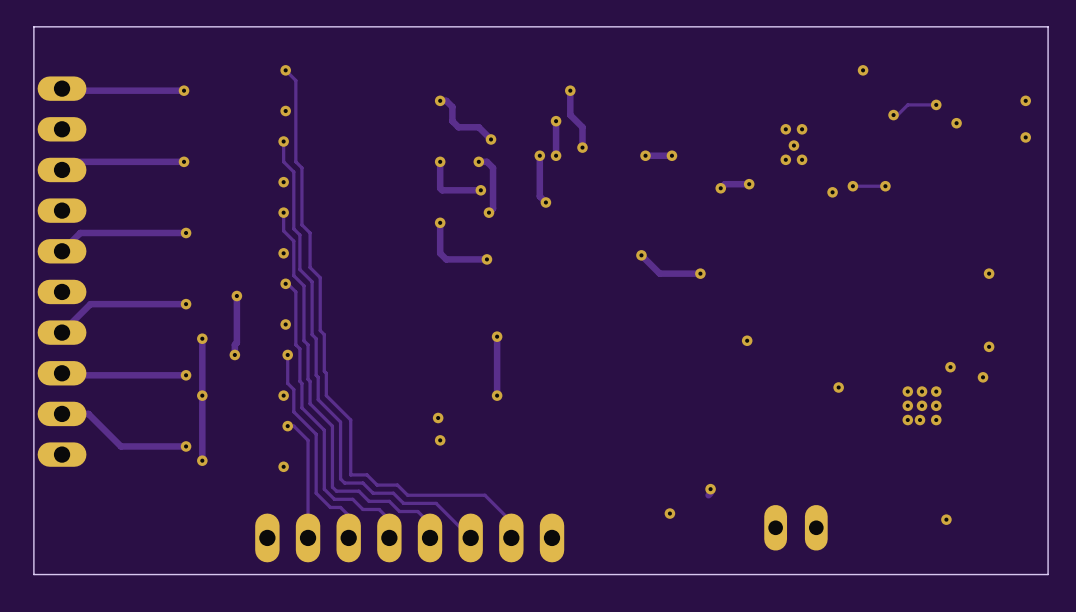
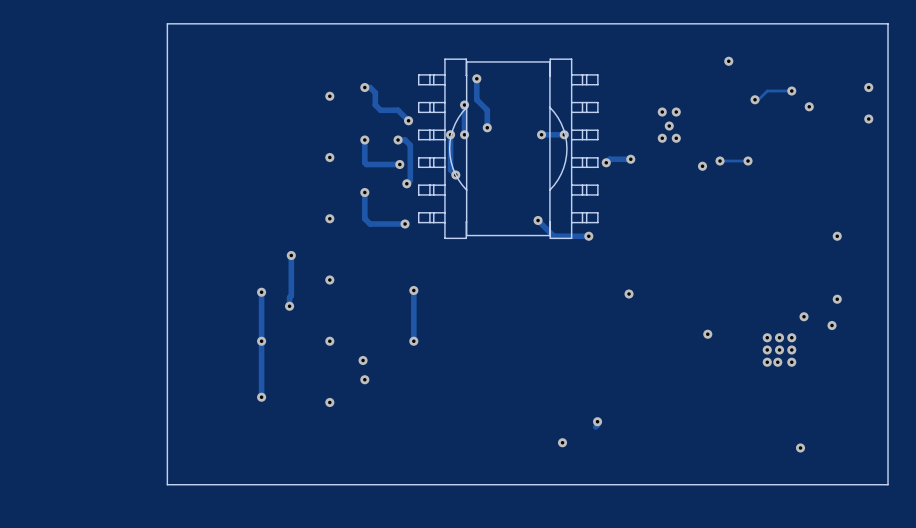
board edge: (210, 26) (33, 26) (33, 574) (1048, 574) (1048, 562) -> (167, 23) (167, 484) (888, 484)
track: (285, 70) (295, 80) (295, 161) (301, 167) (301, 224) (310, 232) (310, 267) (320, 277) (320, 330) (324, 334) (326, 395) (350, 420) (350, 474) (367, 474) (377, 485) (397, 485) (407, 495) (484, 495) (511, 521) (511, 537) -> none
via: (285, 70) -> none
track: (62, 88) (64, 90) (184, 90) -> none
via: (184, 90) -> none
via: (285, 111) -> none
via: none -> (329, 96)
track: (283, 141) (283, 161) (293, 172) (293, 228) (299, 235) (299, 269) (312, 281) (312, 334) (316, 338) (318, 399) (340, 422) (340, 478) (344, 483) (362, 483) (373, 493) (393, 493) (403, 503) (436, 503) (470, 537) -> none
via: (283, 141) -> none
track: (184, 161) (70, 161) (62, 169) -> none
via: (184, 161) -> none
part: none -> (508, 148)
via: (283, 182) -> none
via: none -> (329, 157)
track: (283, 212) (283, 230) (293, 241) (293, 275) (303, 285) (303, 340) (308, 344) (310, 403) (332, 426) (332, 487) (336, 491) (358, 491) (369, 501) (389, 501) (399, 511) (417, 511) (430, 523) (430, 537) -> none
via: (283, 212) -> none
track: (186, 232) (80, 232) (62, 251) -> none
via: (186, 232) -> none
via: (283, 253) -> none
via: none -> (329, 218)
part: (62, 271) -> none
track: (285, 283) (295, 291) (295, 344) (299, 348) (301, 407) (324, 430) (324, 489) (334, 499) (352, 499) (362, 509) (379, 509) (389, 519) (389, 537) -> none
via: (285, 283) -> none
track: (236, 296) (236, 342) (234, 344) (234, 354) -> (291, 255) (289, 306)
via: (236, 296) -> none
via: none -> (291, 255)
track: (186, 304) (90, 304) (62, 332) -> none
via: (186, 304) -> none
via: (285, 324) -> none
via: none -> (329, 280)
track: (202, 338) (202, 460) -> (261, 292) (261, 397)
via: (202, 338) -> none
via: none -> (261, 292)
via: (234, 354) -> none
track: (287, 354) (287, 383) (293, 389) (293, 411) (316, 434) (316, 493) (330, 507) (340, 507) (348, 515) (348, 537) -> none
via: (287, 354) -> none
via: none -> (289, 306)
track: (62, 373) (64, 375) (186, 375) -> none
via: (186, 375) -> none
via: (202, 395) -> none
via: (283, 395) -> none
via: none -> (261, 341)
via: none -> (329, 341)
track: (62, 413) (88, 413) (121, 446) (186, 446) -> none
track: (287, 426) (293, 426) (308, 440) (308, 537) -> none
via: (287, 426) -> none
via: (186, 446) -> none
via: (202, 460) -> none
via: none -> (261, 397)
via: (283, 466) -> none
via: none -> (329, 402)
part: (795, 527) -> none
part: (409, 537) -> none

